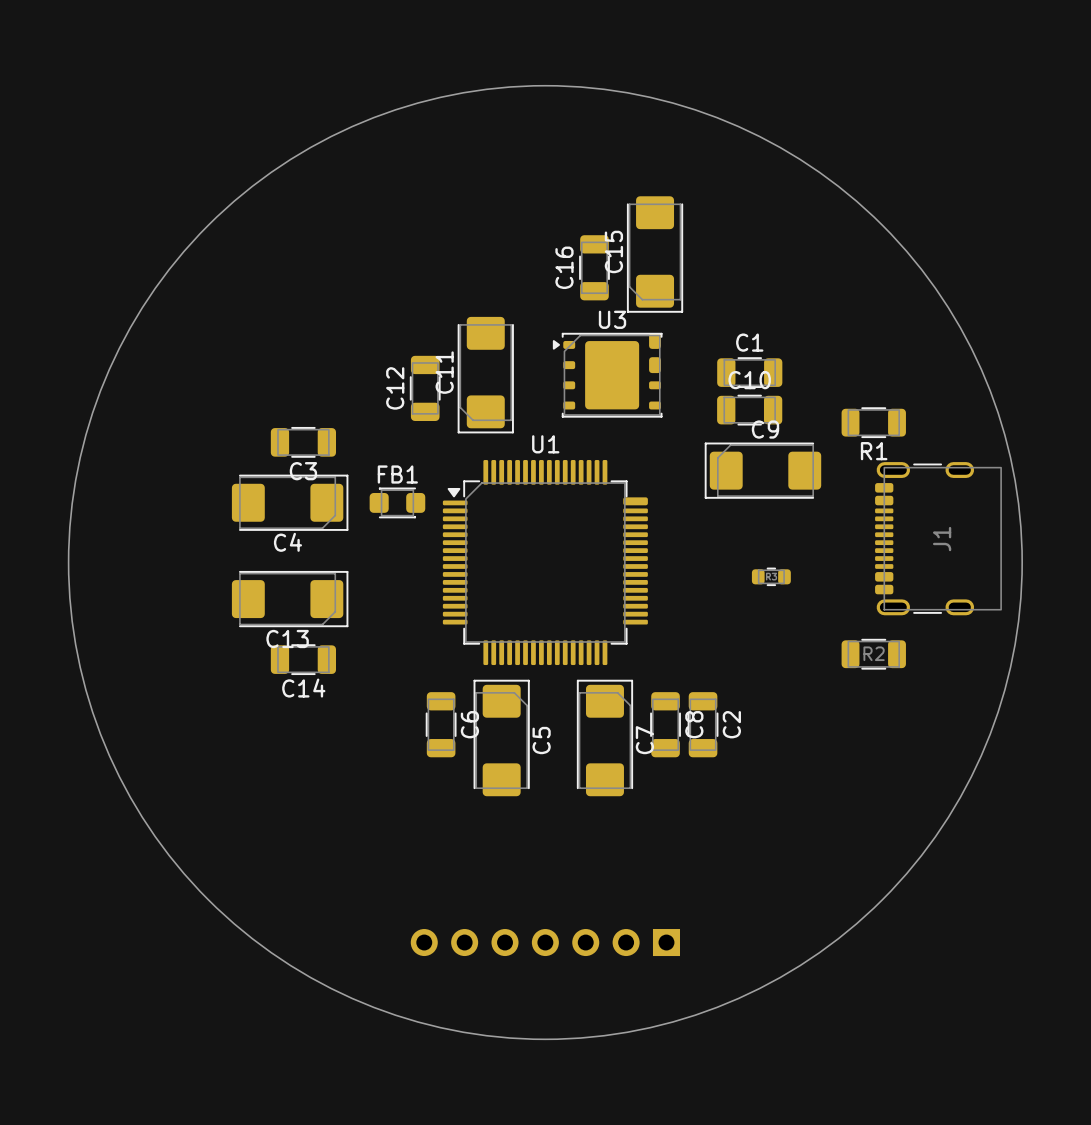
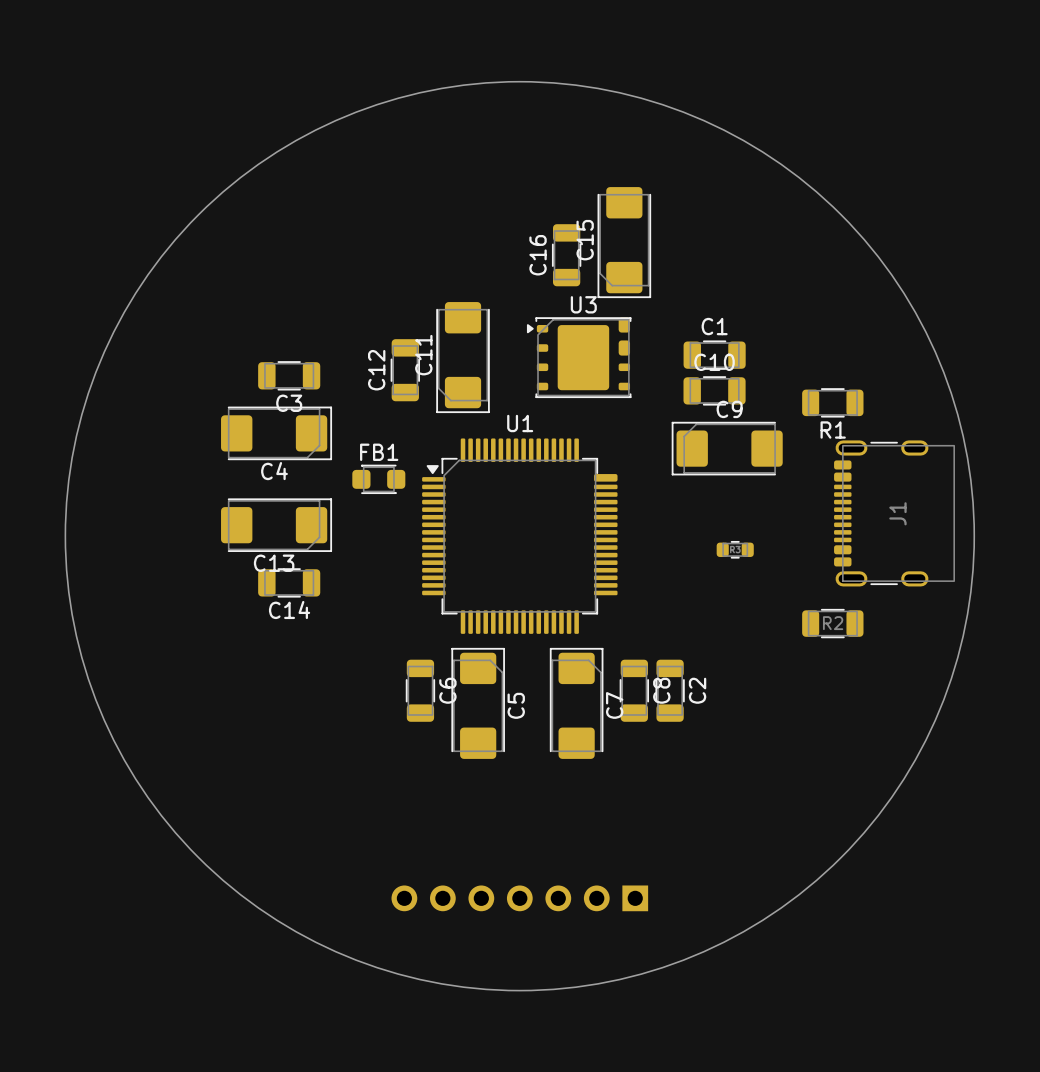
C3 position: (303, 442) -> (289, 375)
C4 position: (290, 502) -> (276, 433)
C13 position: (290, 599) -> (276, 525)
C14 position: (303, 659) -> (289, 582)

